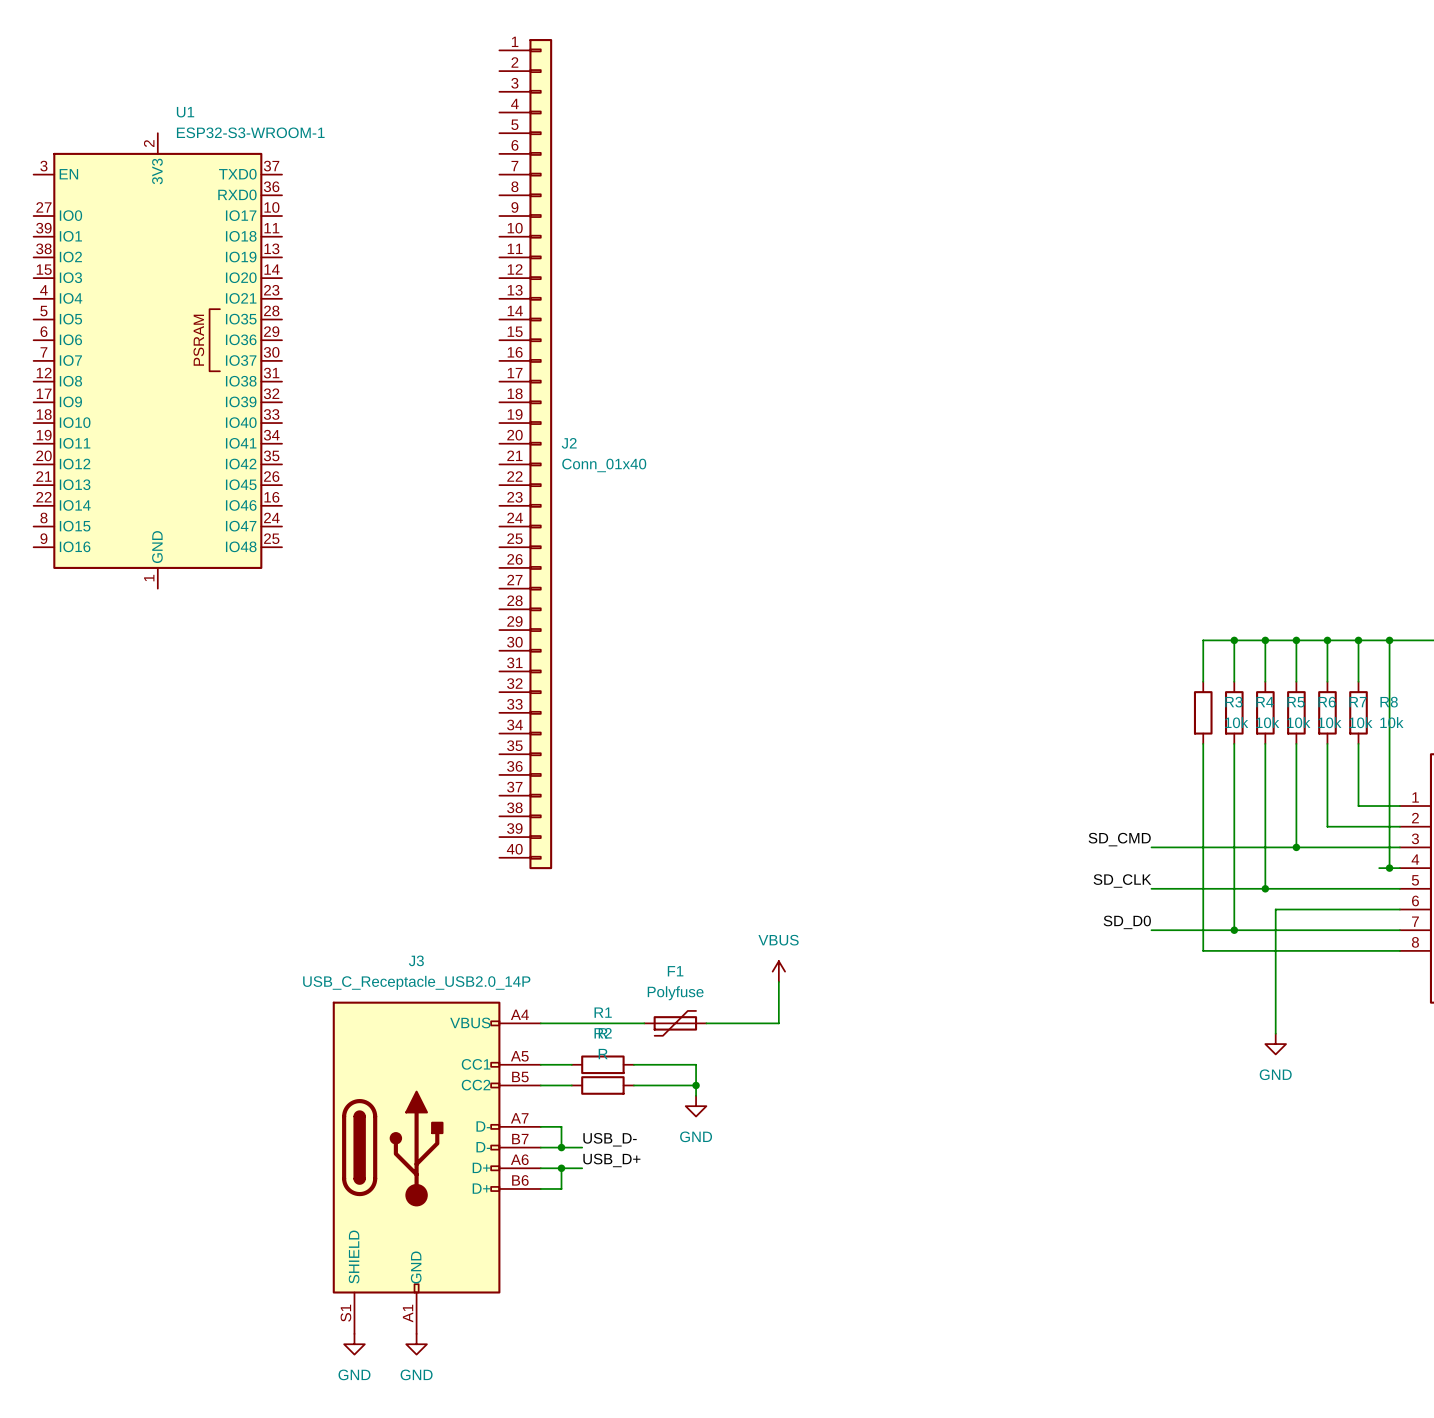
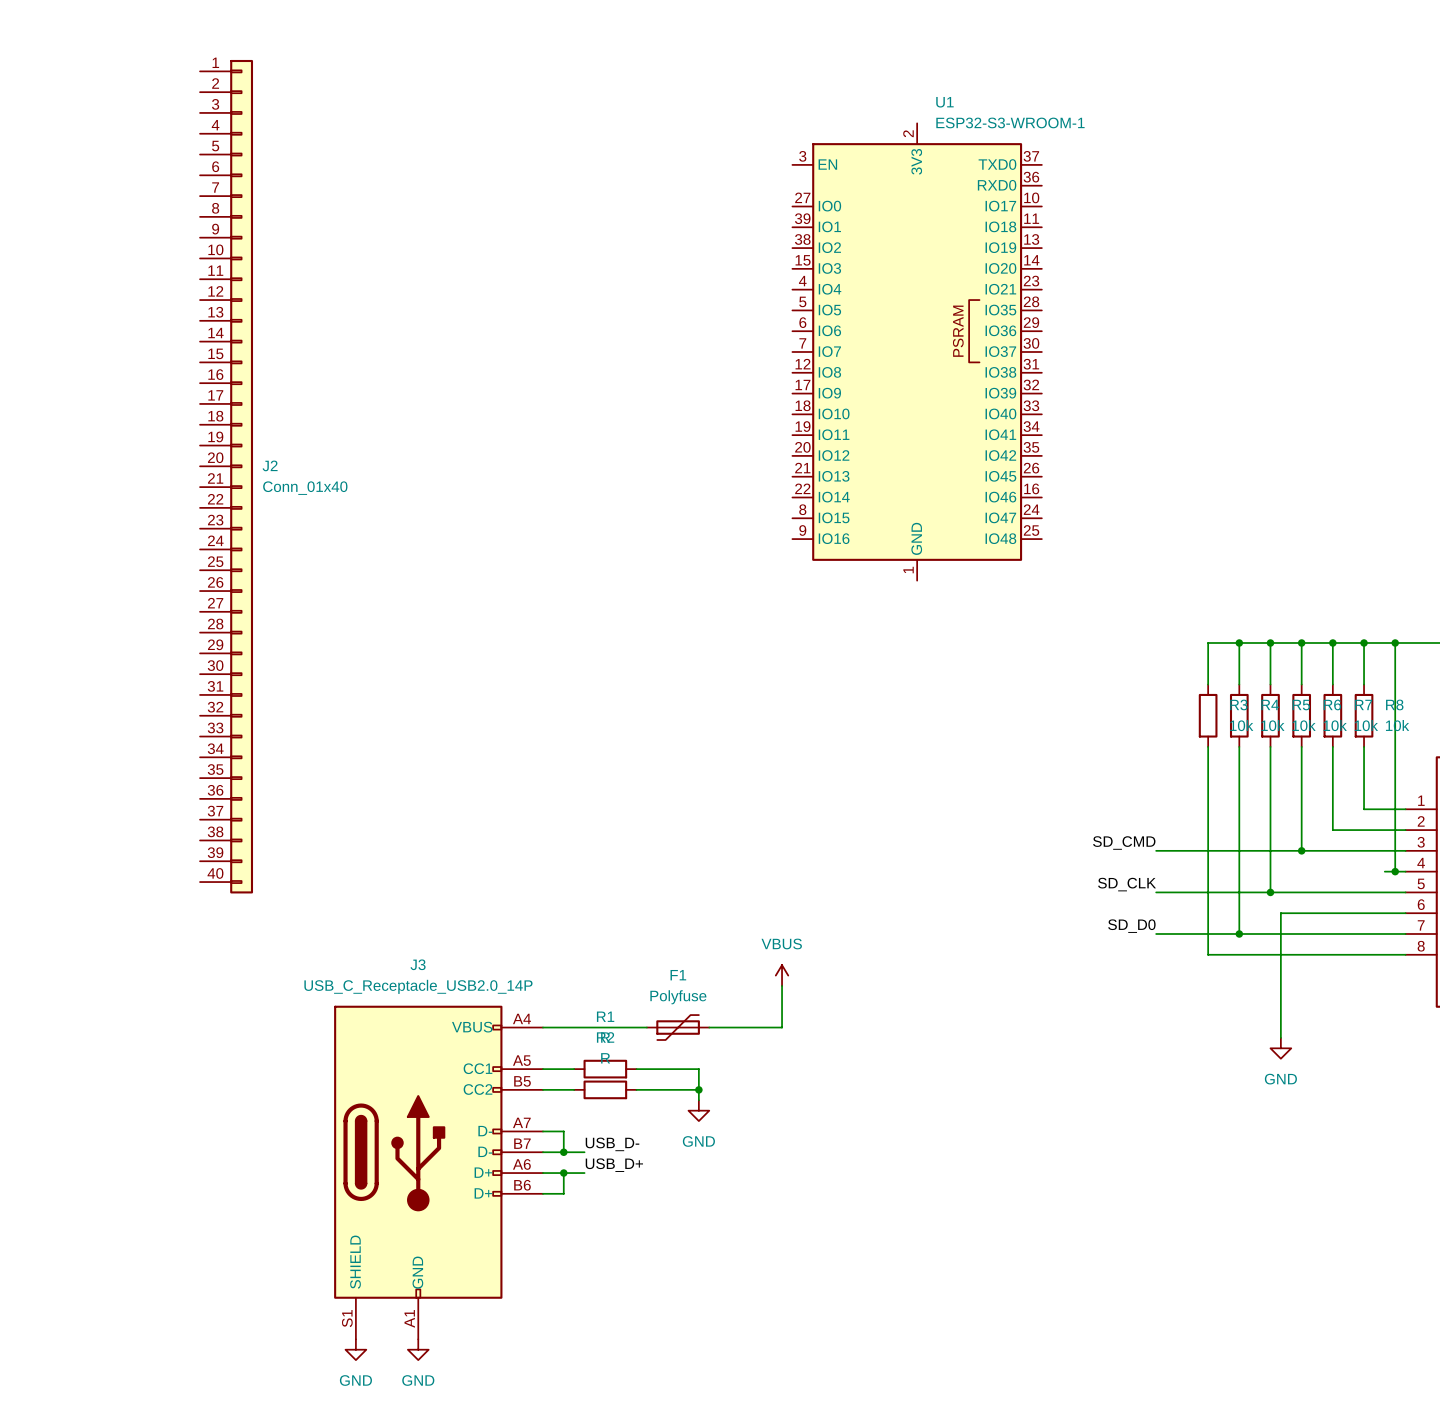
U1 position: (157, 360) -> (917, 351)
J2 position: (525, 454) -> (226, 476)

